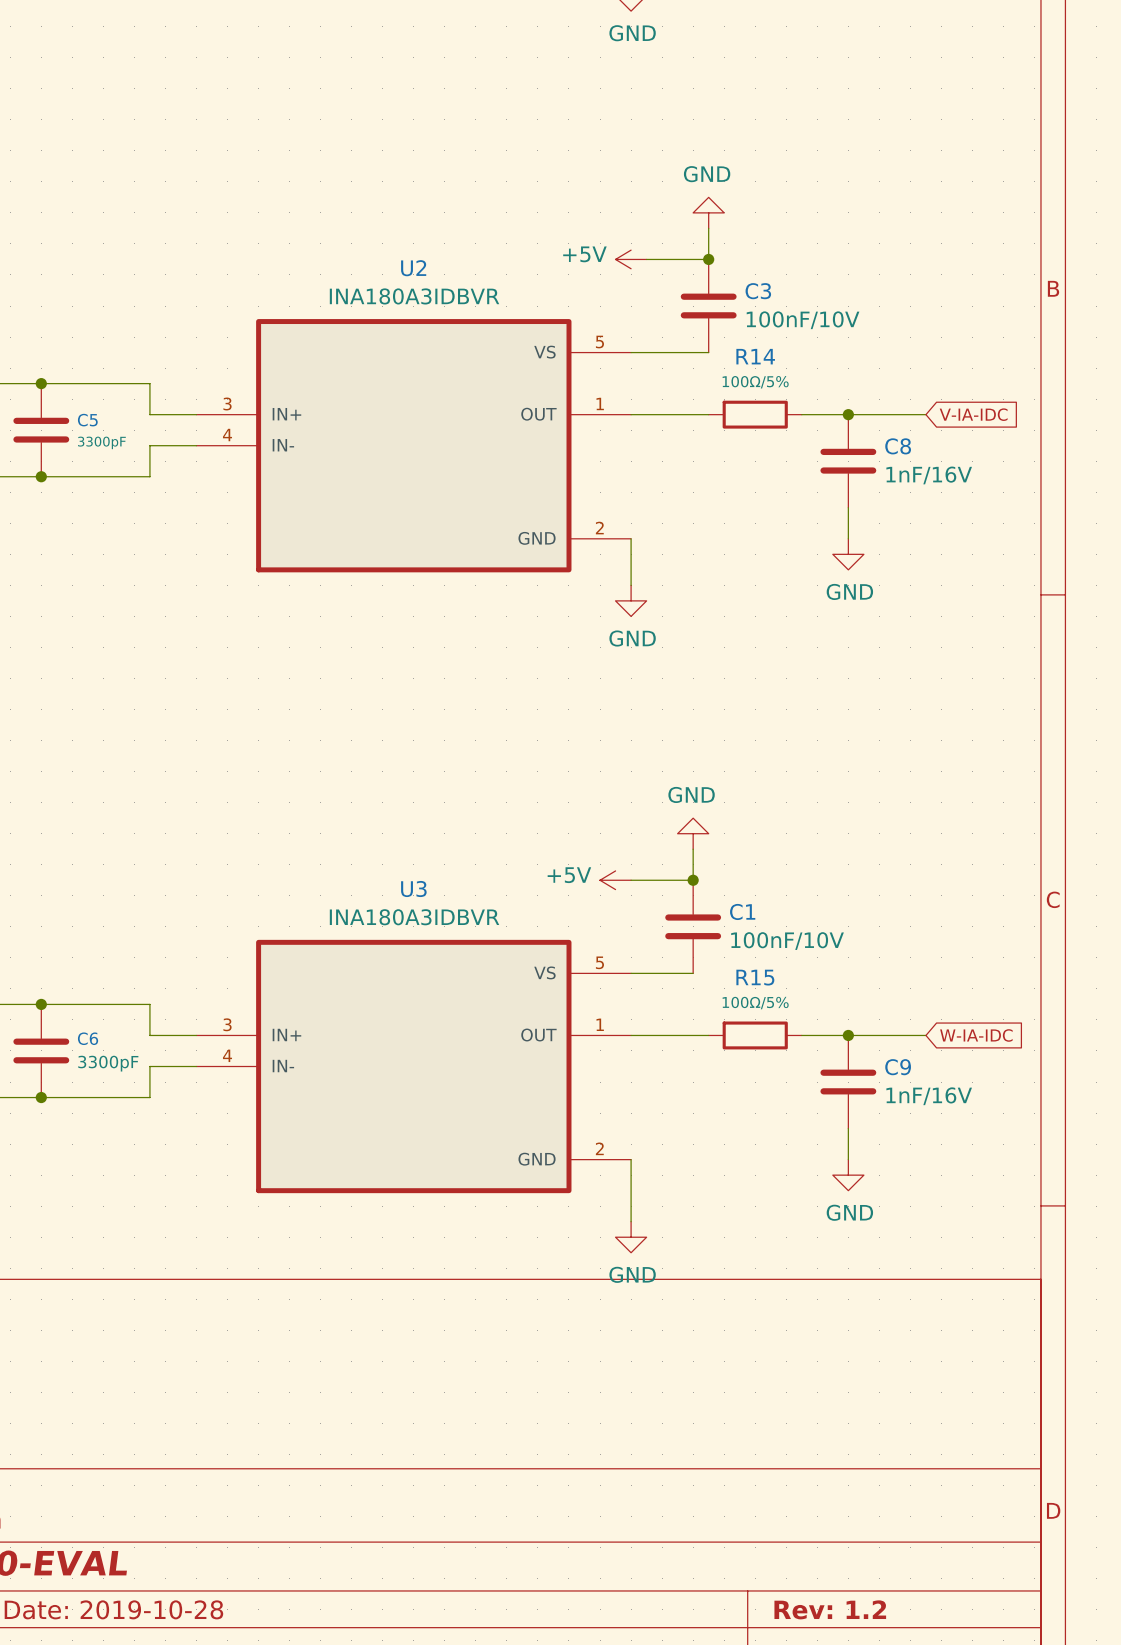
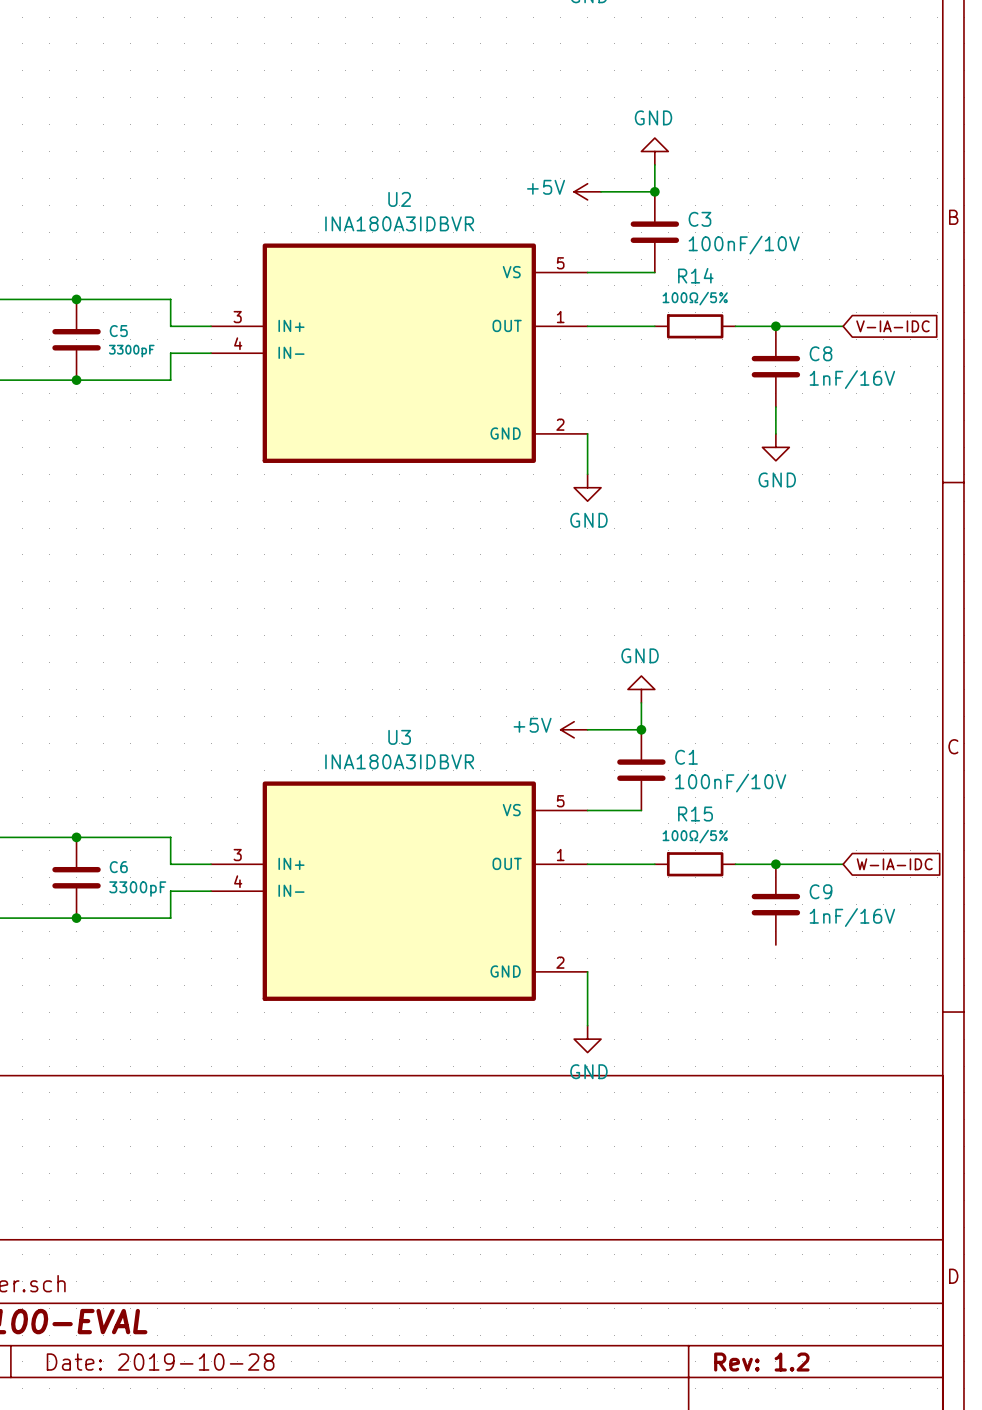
wire: (848, 1128) (848, 1159) -> none
power symbol: GND (848, 1175) -> none

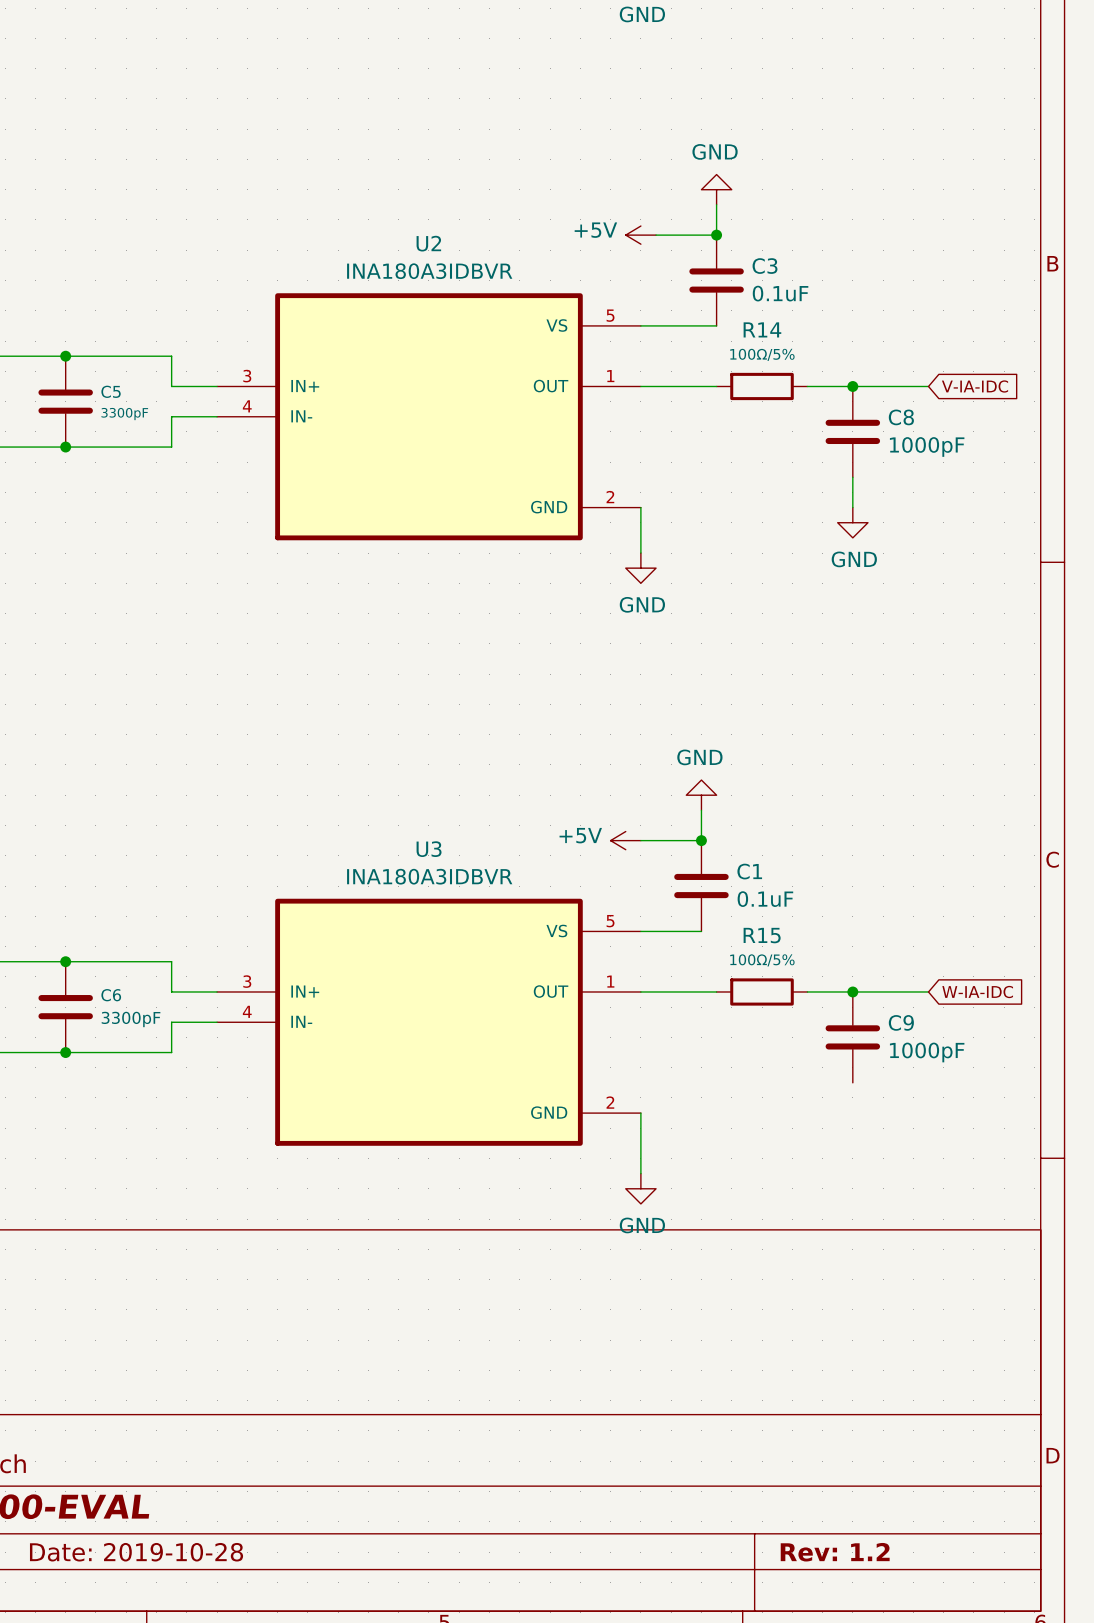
C3 value: 100nF/10V (744, 245) -> 0.1uF (780, 293)
C8 value: 1nF/16V (852, 379) -> 1000pF (927, 446)
C1 value: 100nF/10V (730, 783) -> 0.1uF (765, 899)
C9 value: 1nF/16V (852, 917) -> 1000pF (927, 1052)

